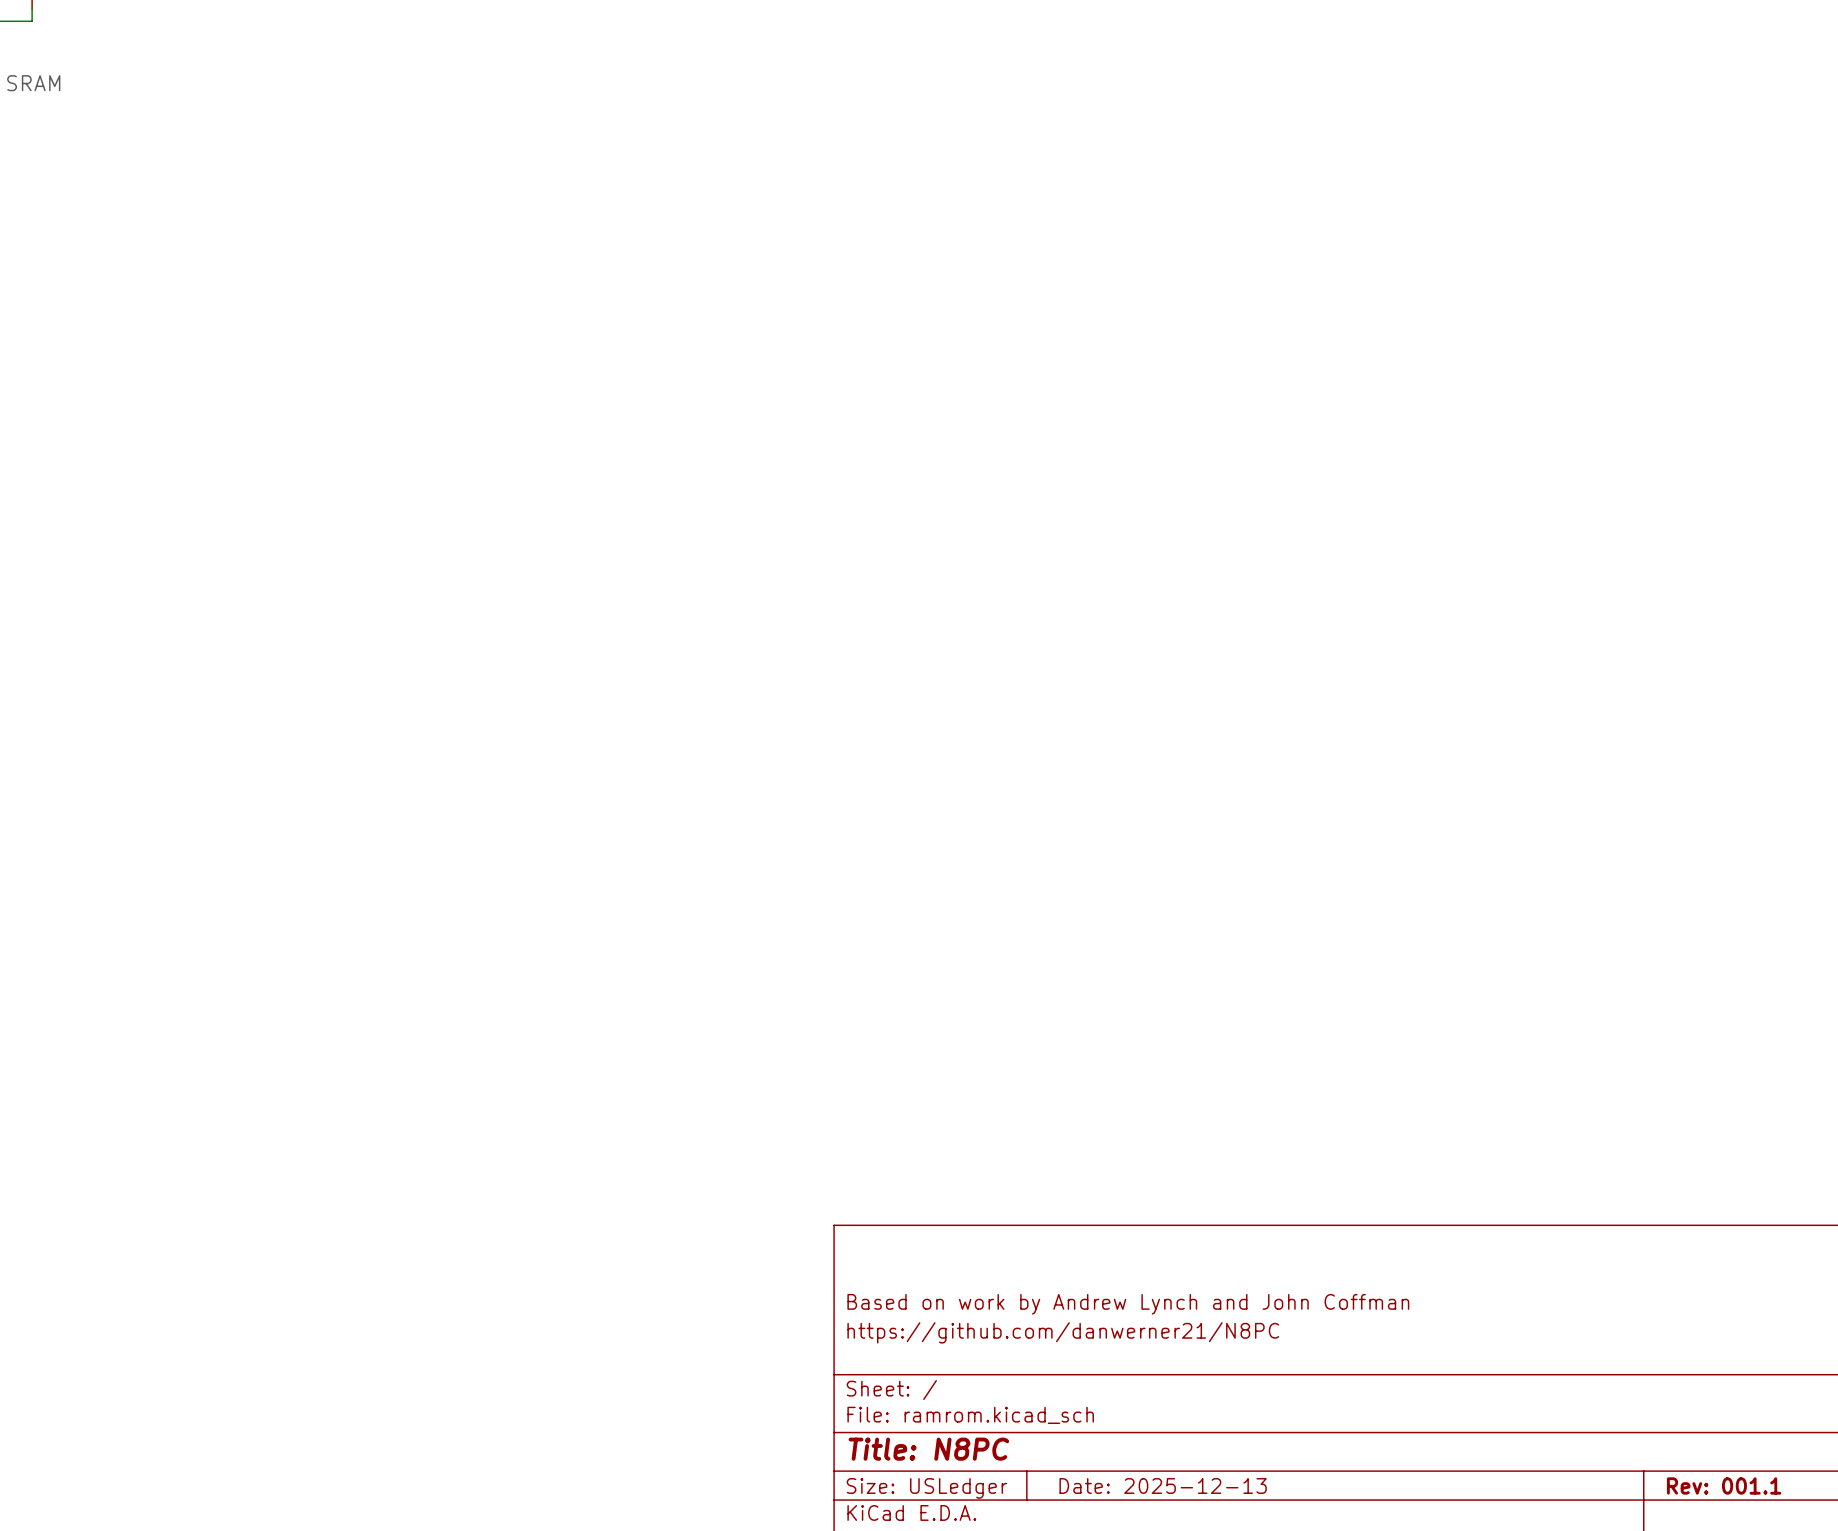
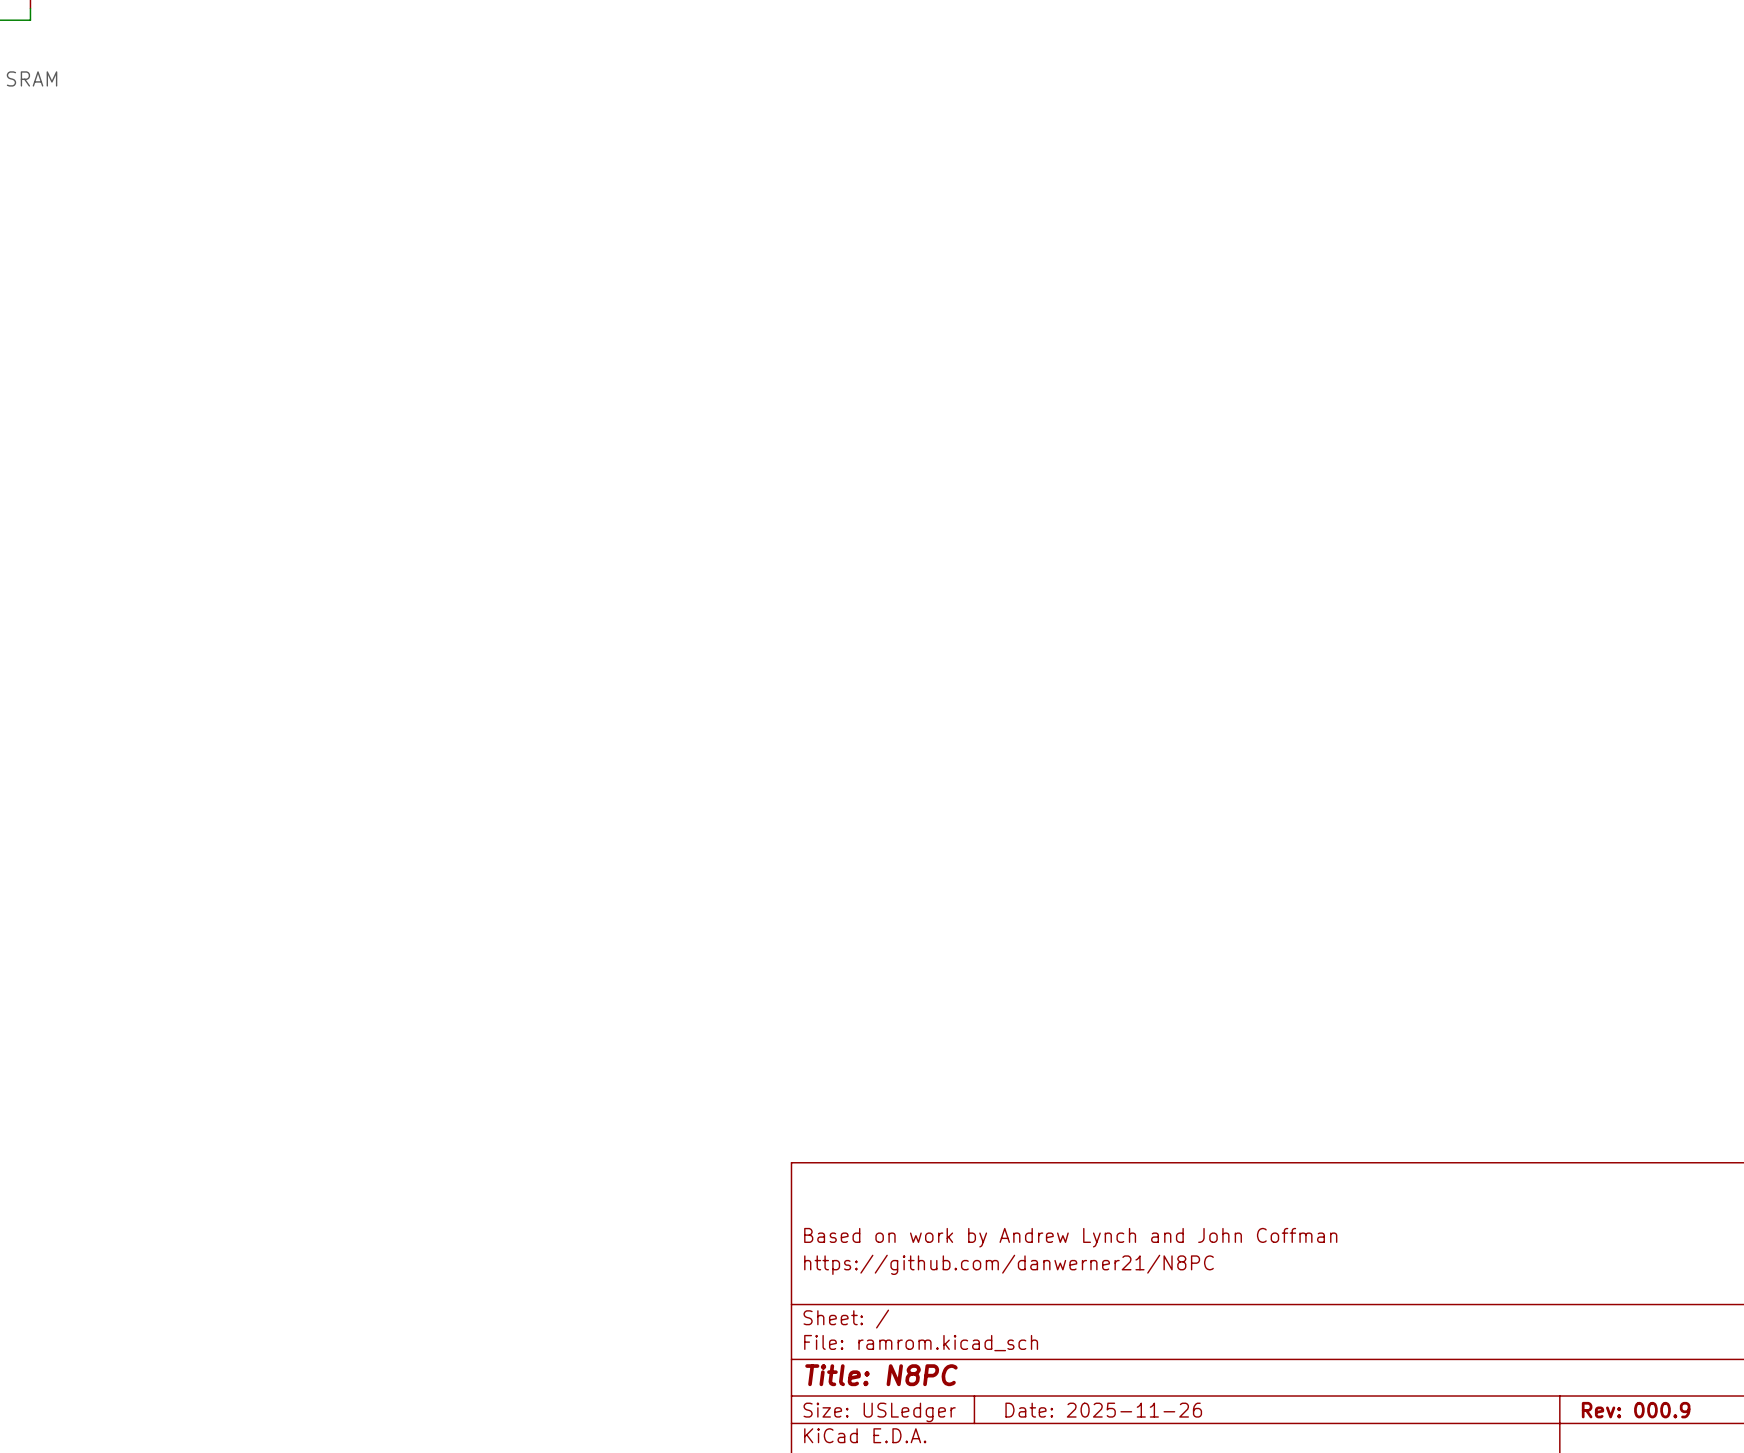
title block: Date: 2025-12-13 (1163, 1485) -> Date: 2025-11-26 (1103, 1410)
title block: Rev: 001.1 (1724, 1485) -> Rev: 000.9 (1636, 1410)

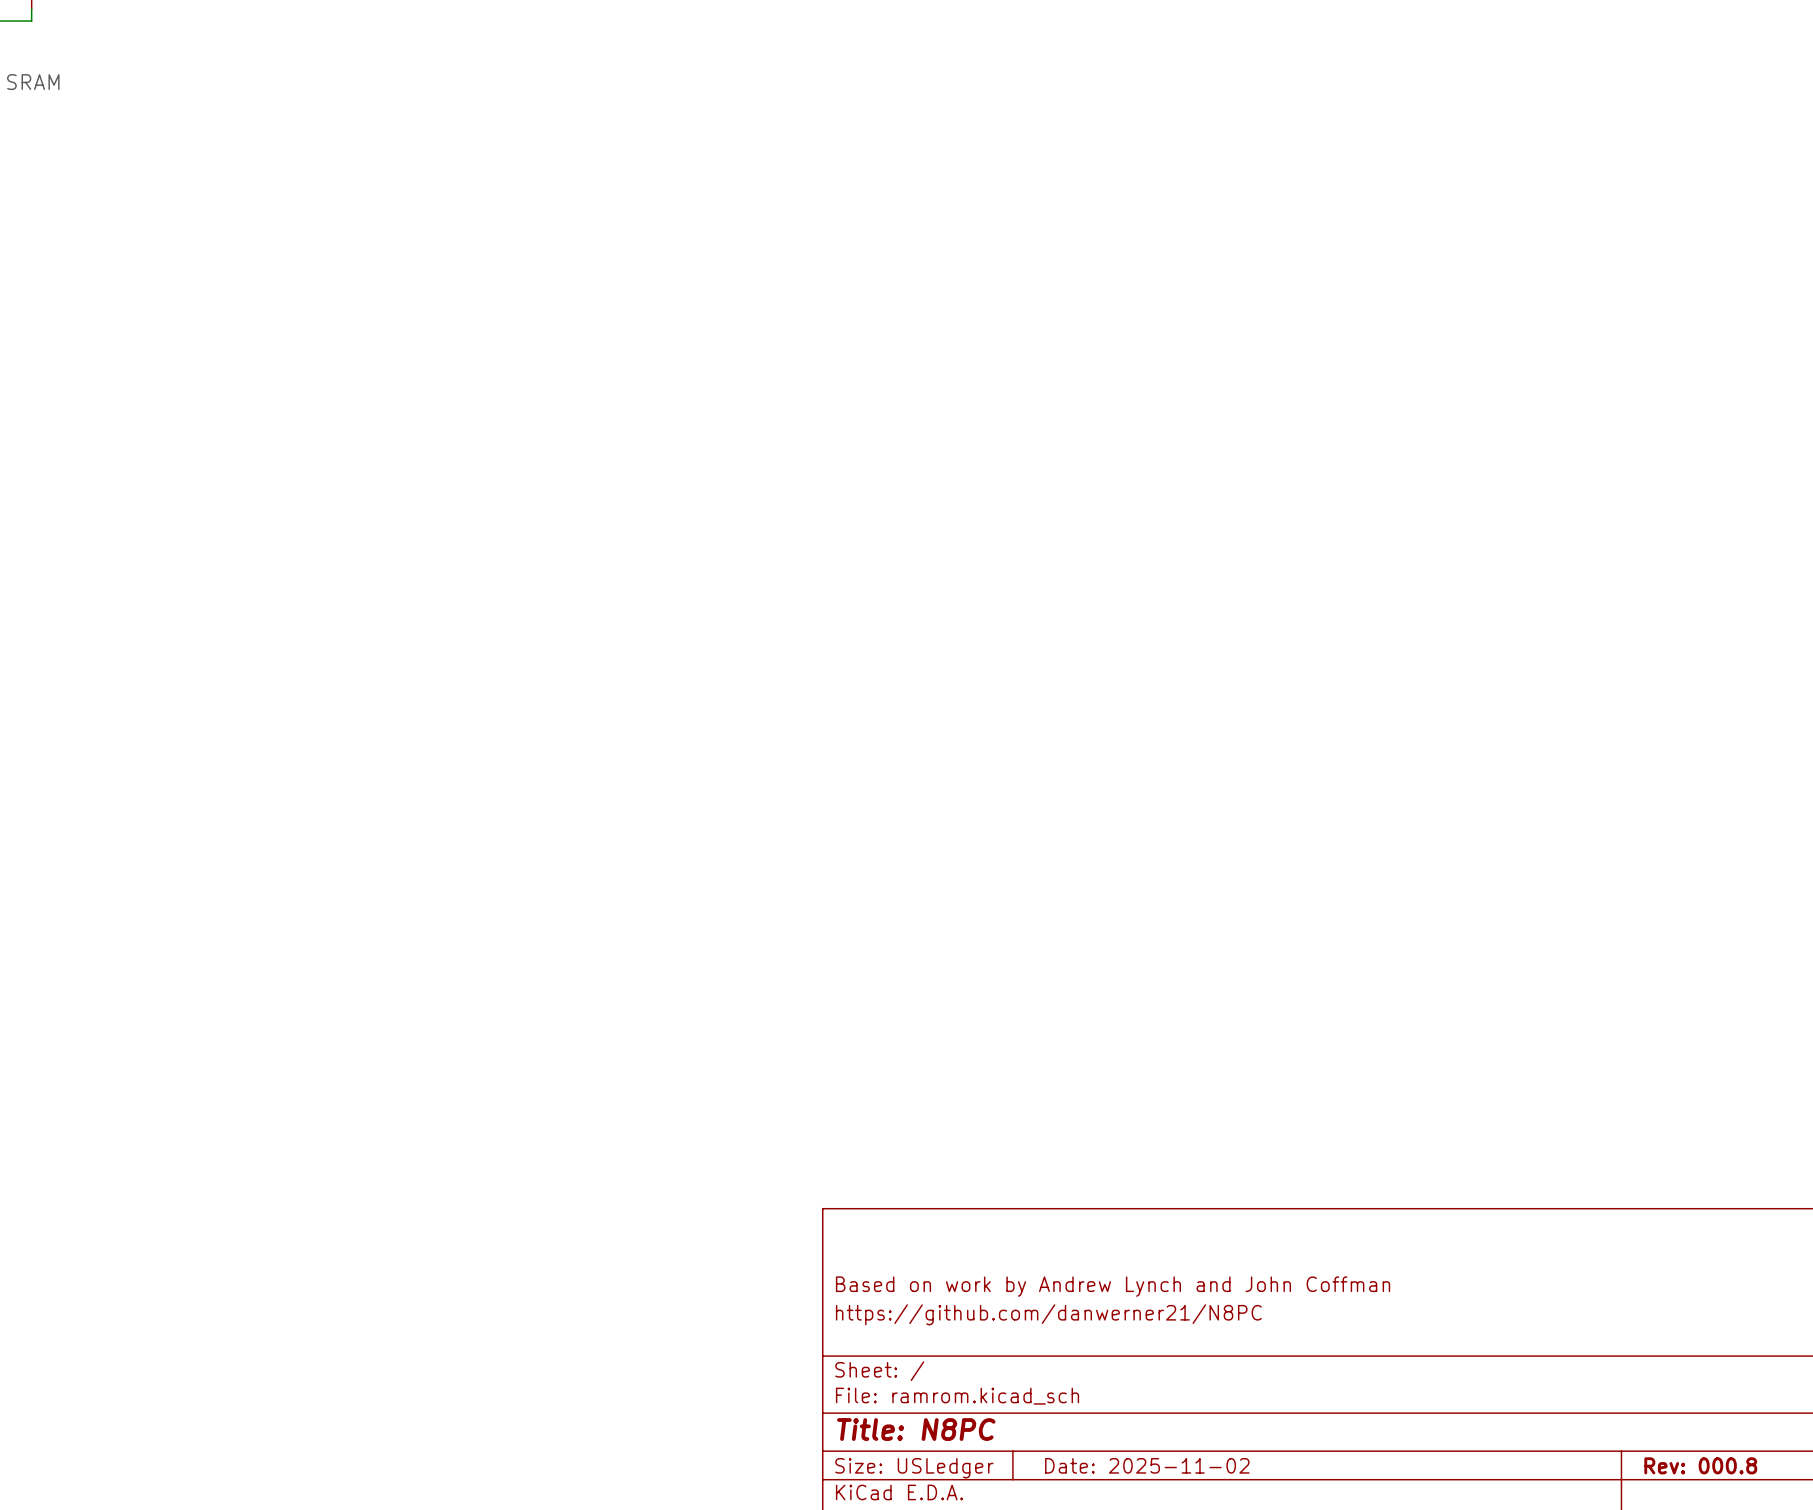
title block: Date: 2025-11-26 (1103, 1410) -> Date: 2025-11-02 (1147, 1465)
title block: Rev: 000.9 (1636, 1410) -> Rev: 000.8 (1700, 1465)

